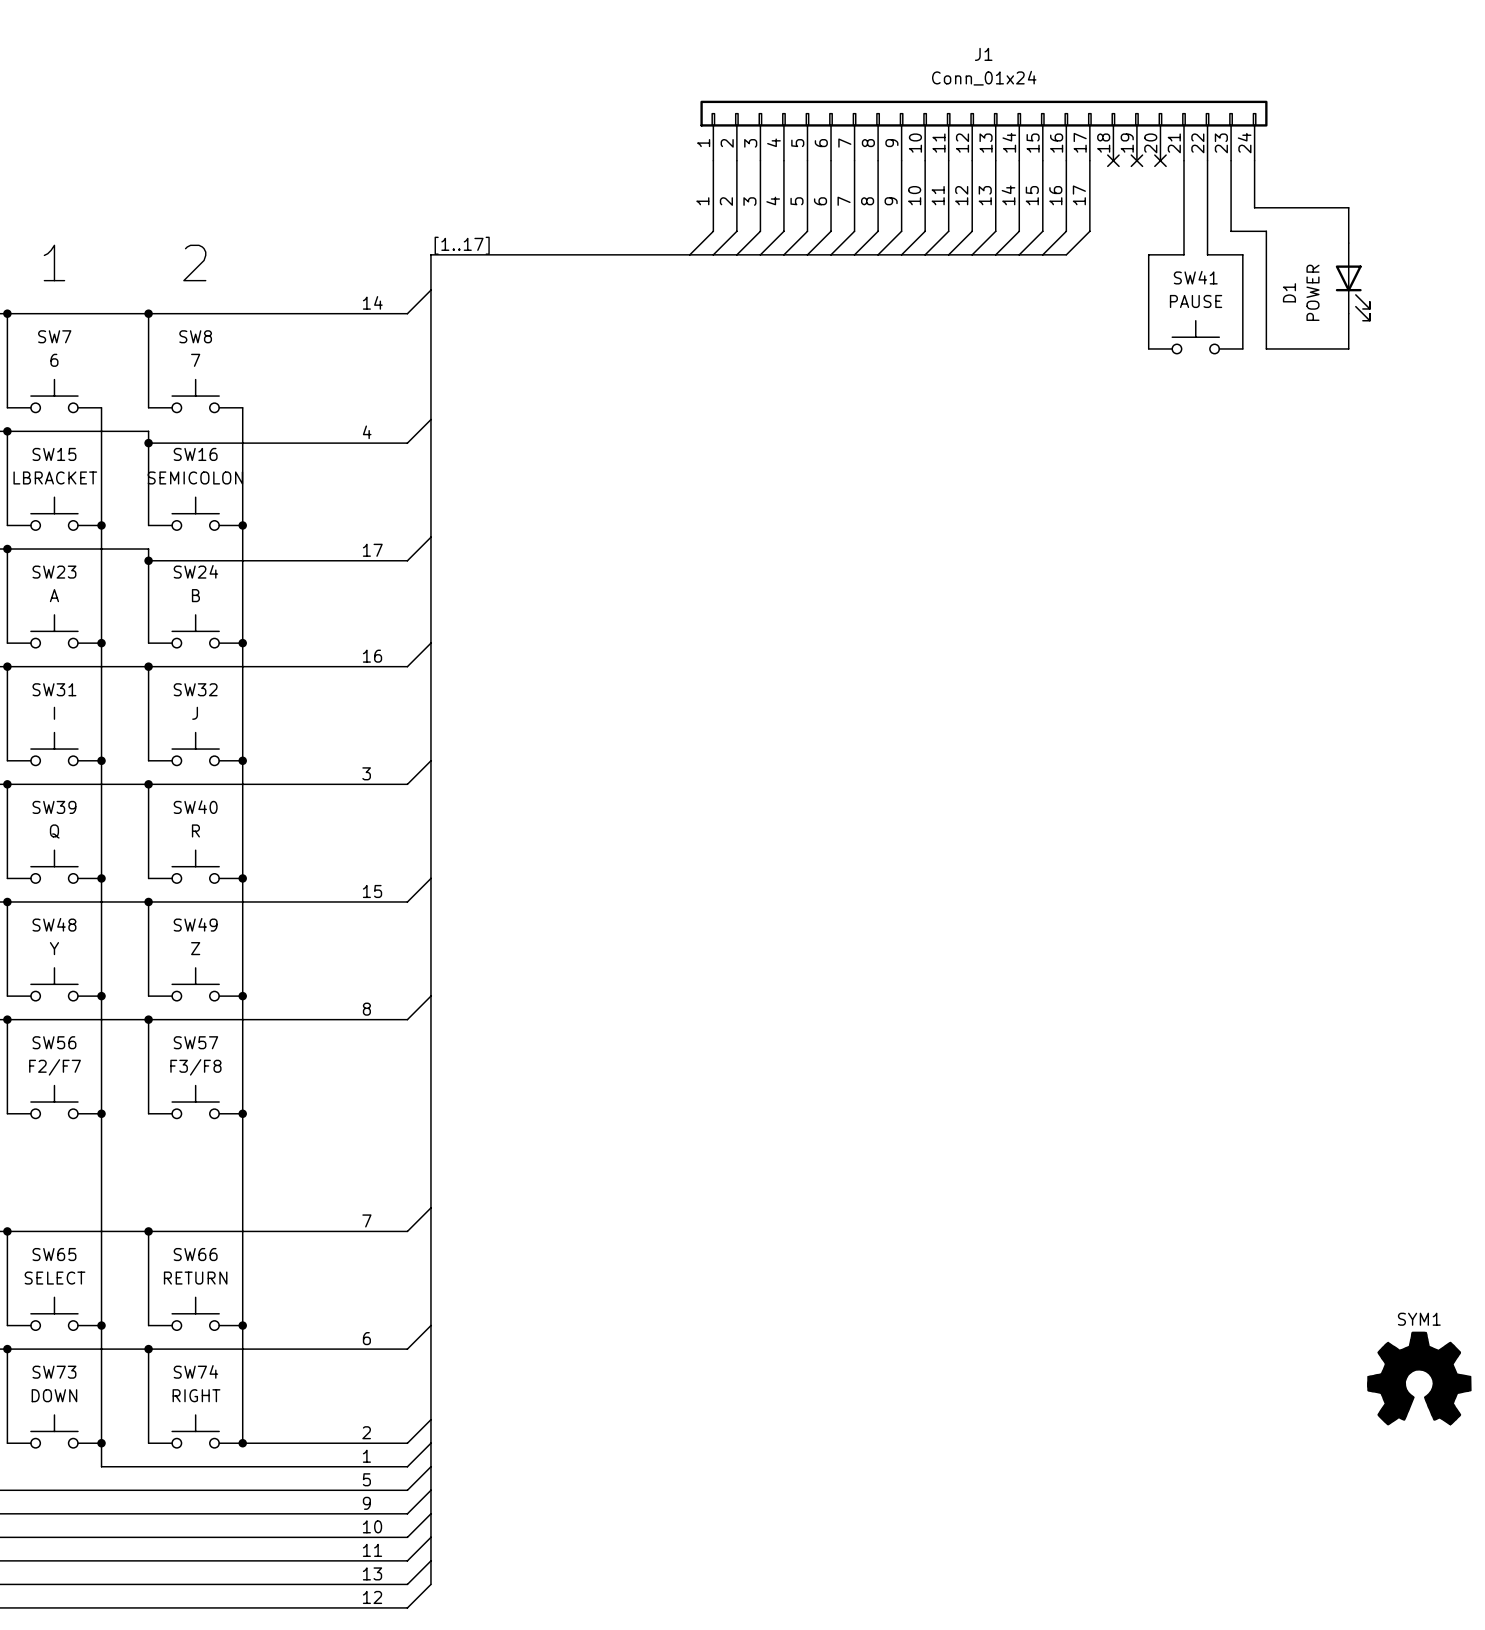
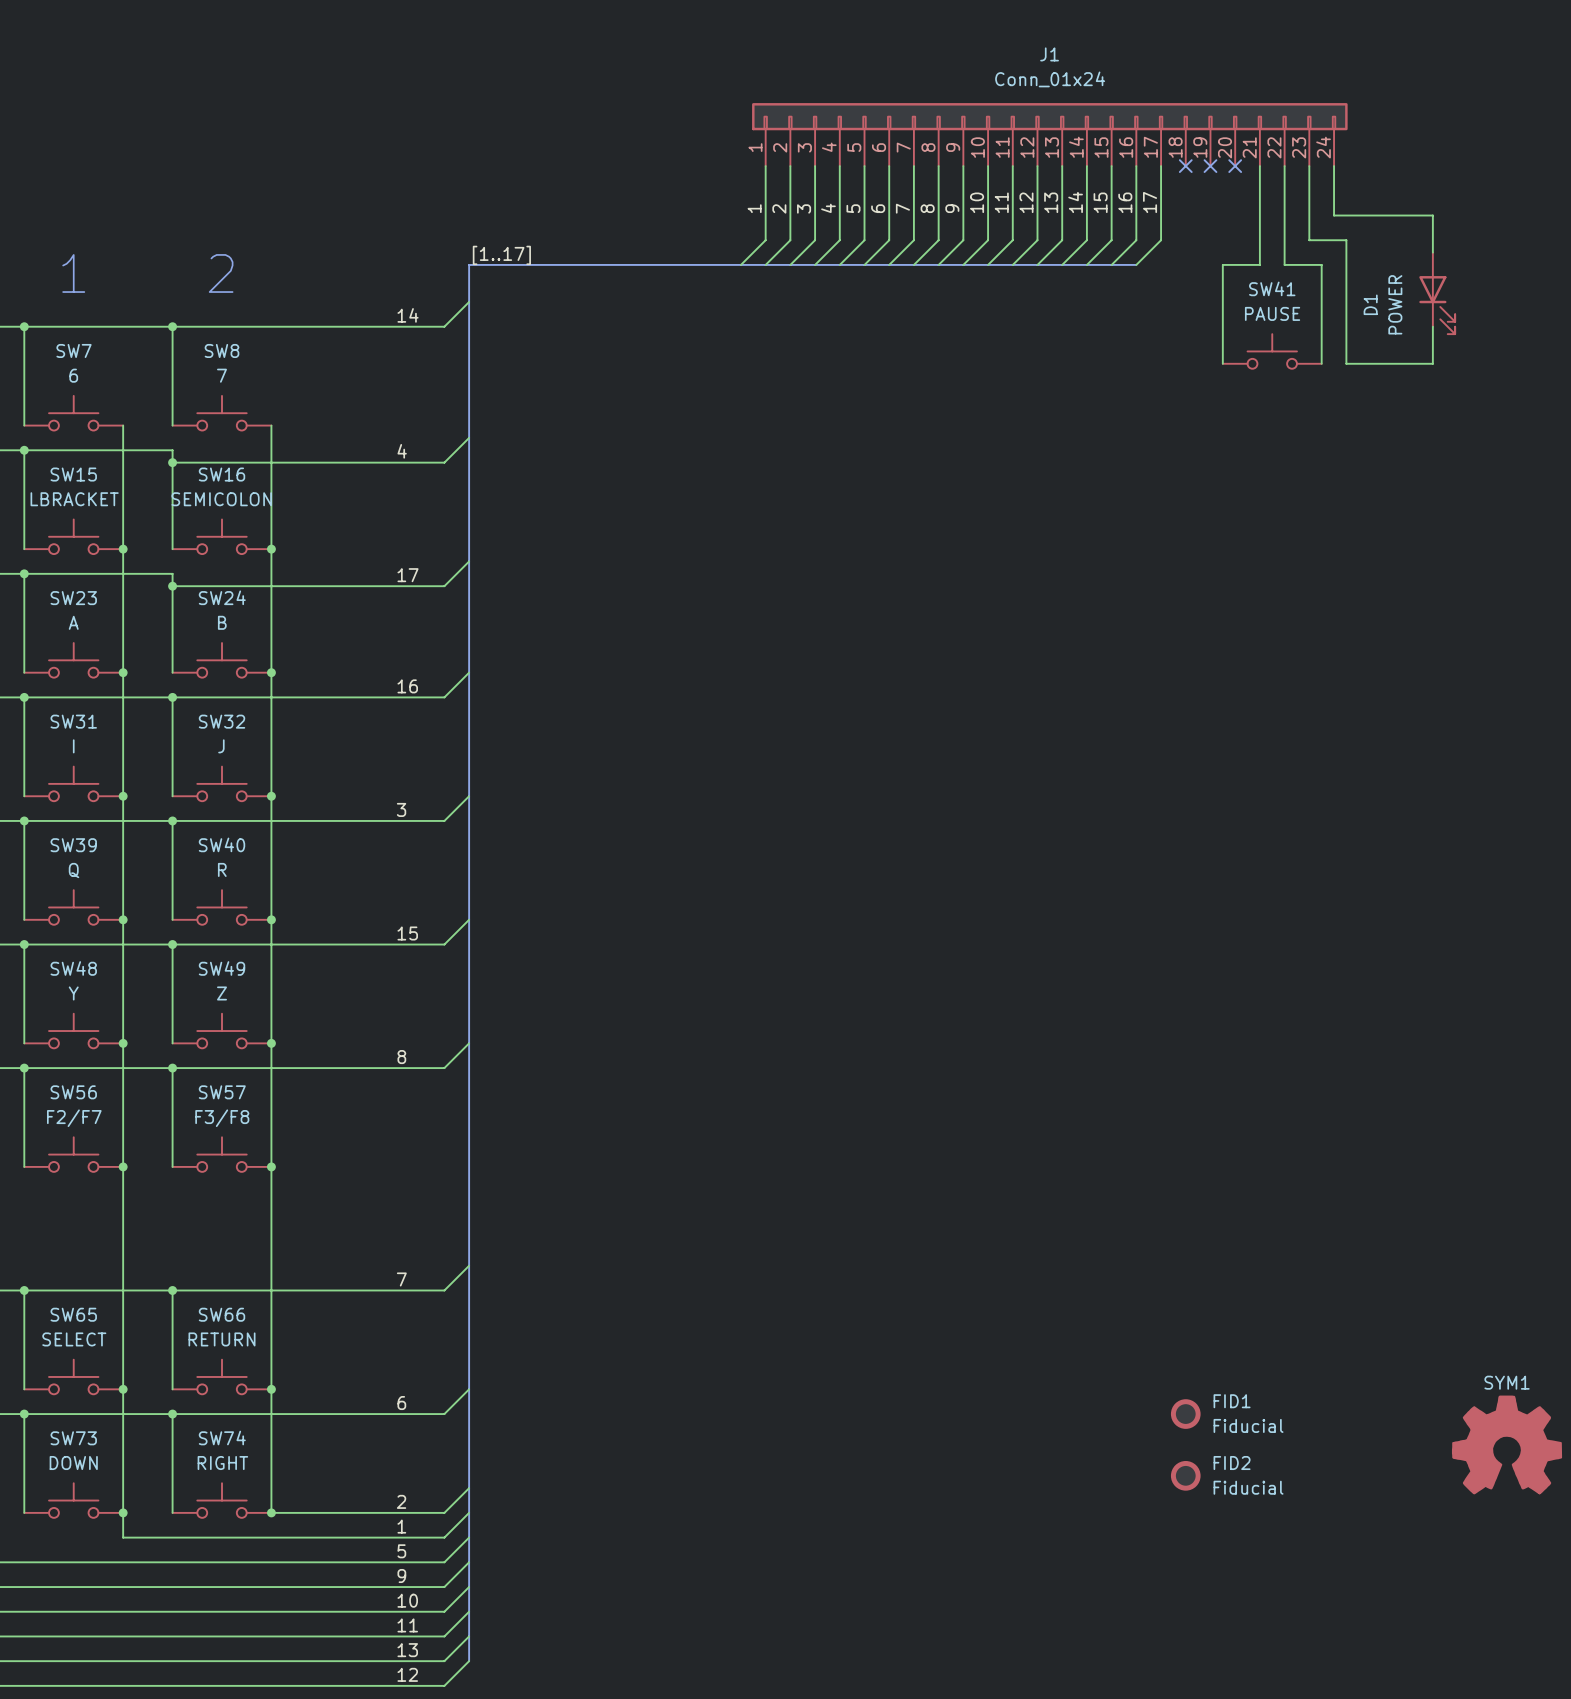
FID1: none -> Fiducial (1185, 1414)
FID2: none -> Fiducial (1185, 1475)

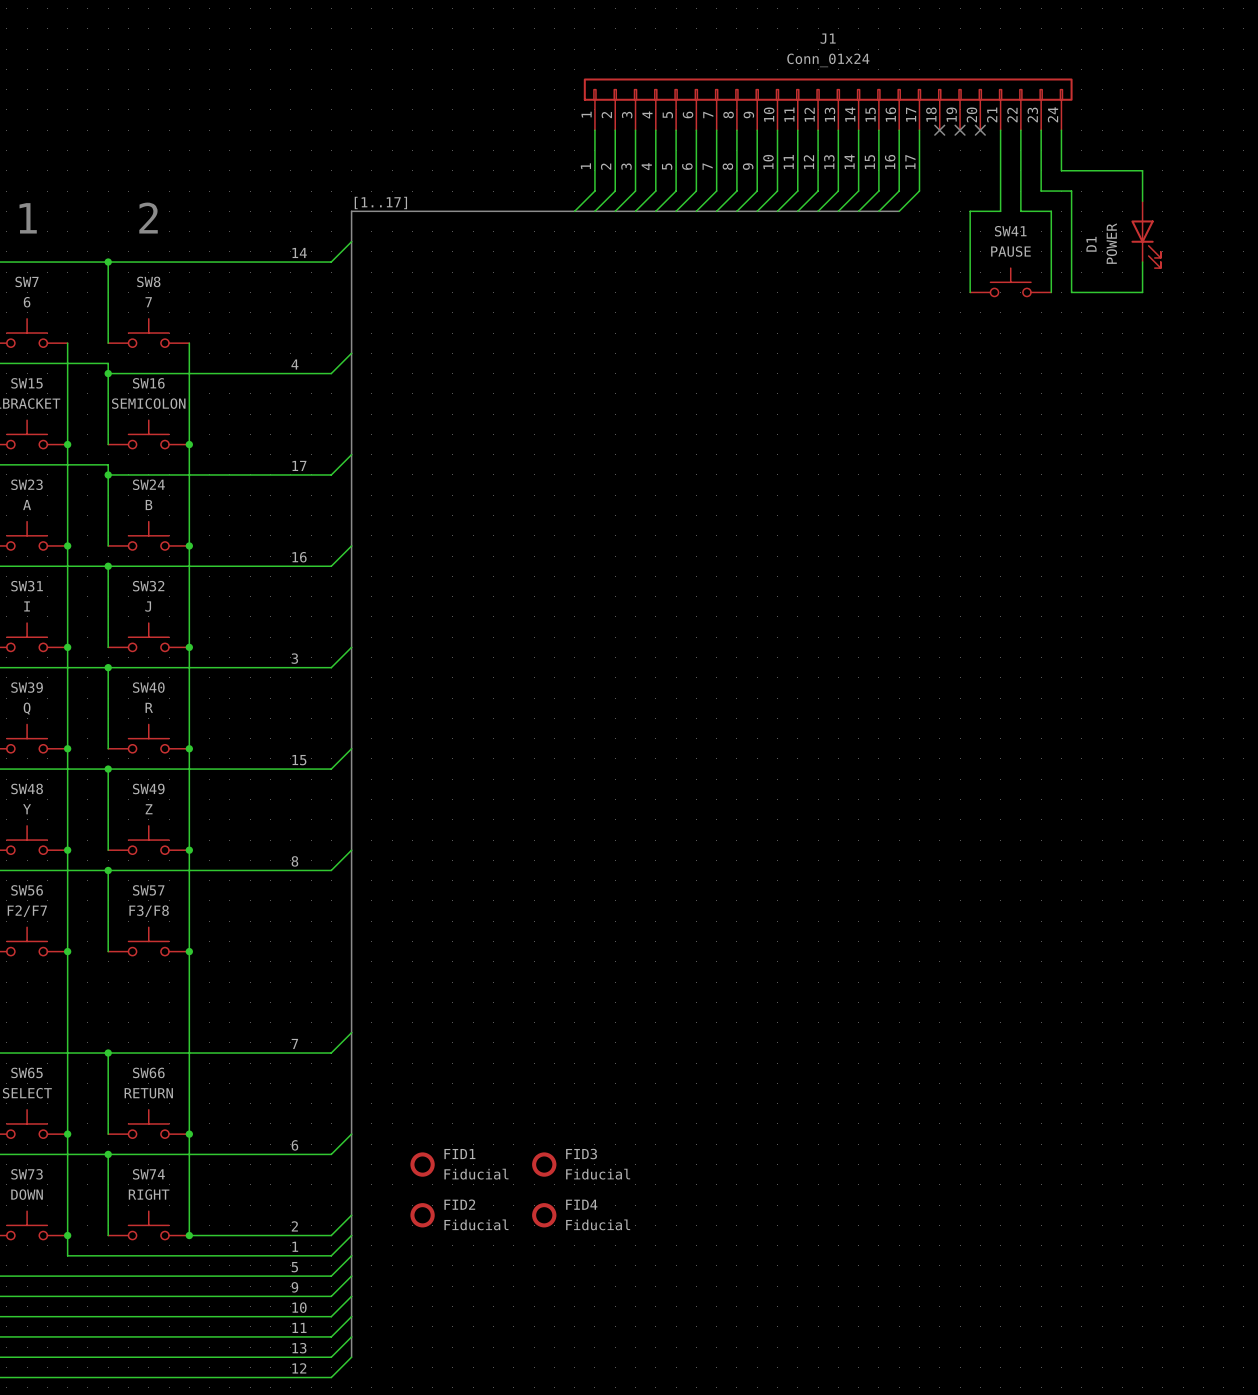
FID1 position: (1185, 1414) -> (422, 1164)
FID3: none -> Fiducial (544, 1164)
SYM1: (1507, 1444) -> none
FID2 position: (1185, 1475) -> (422, 1215)
FID4: none -> Fiducial (544, 1215)

